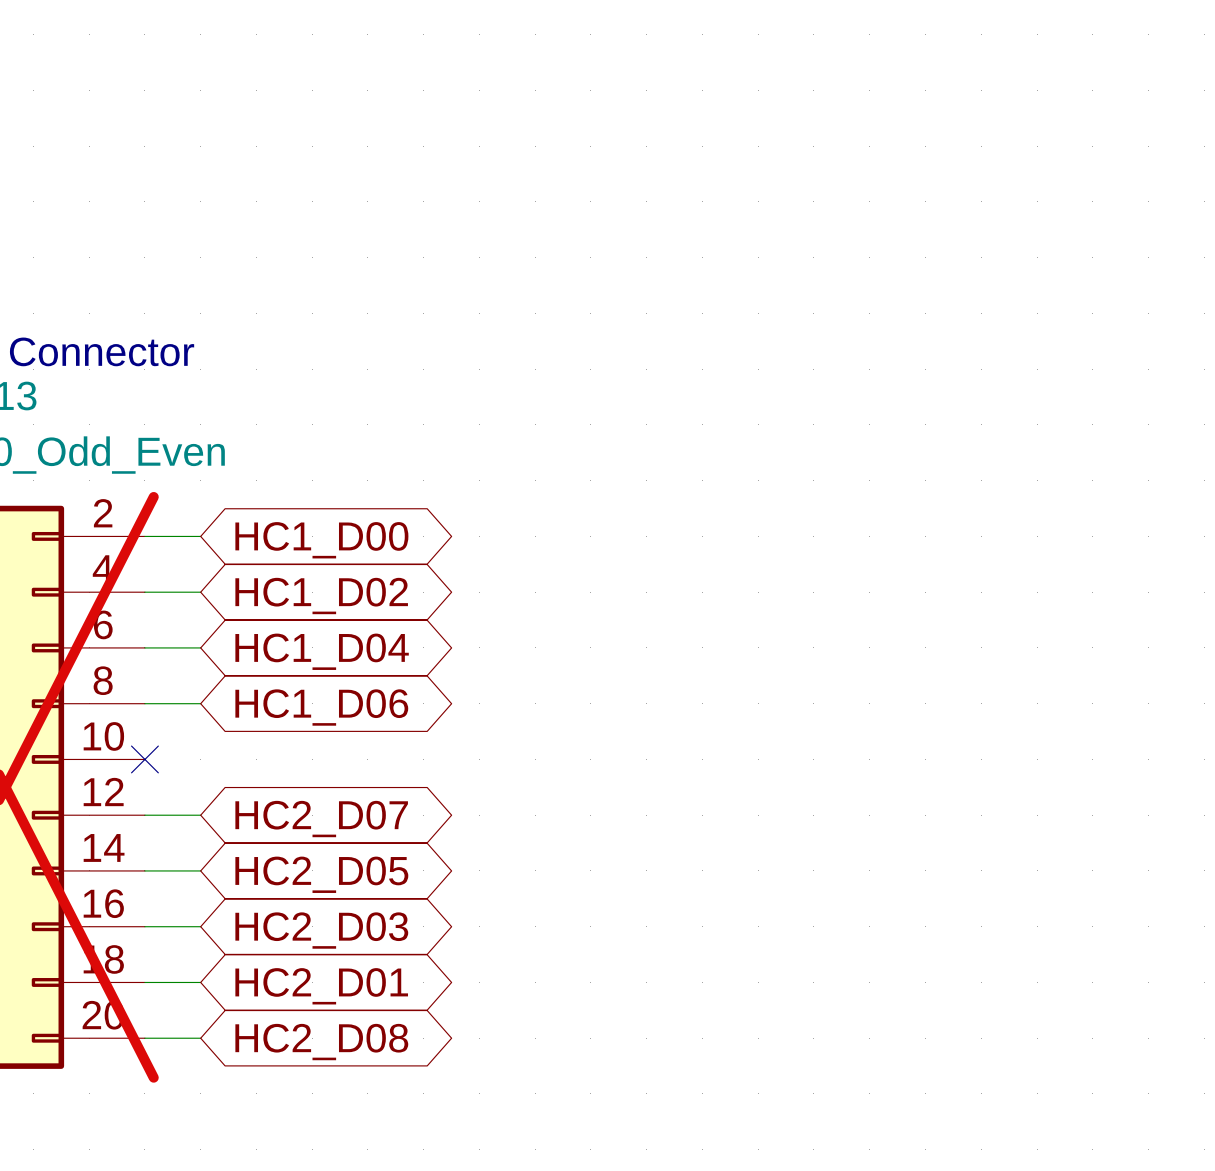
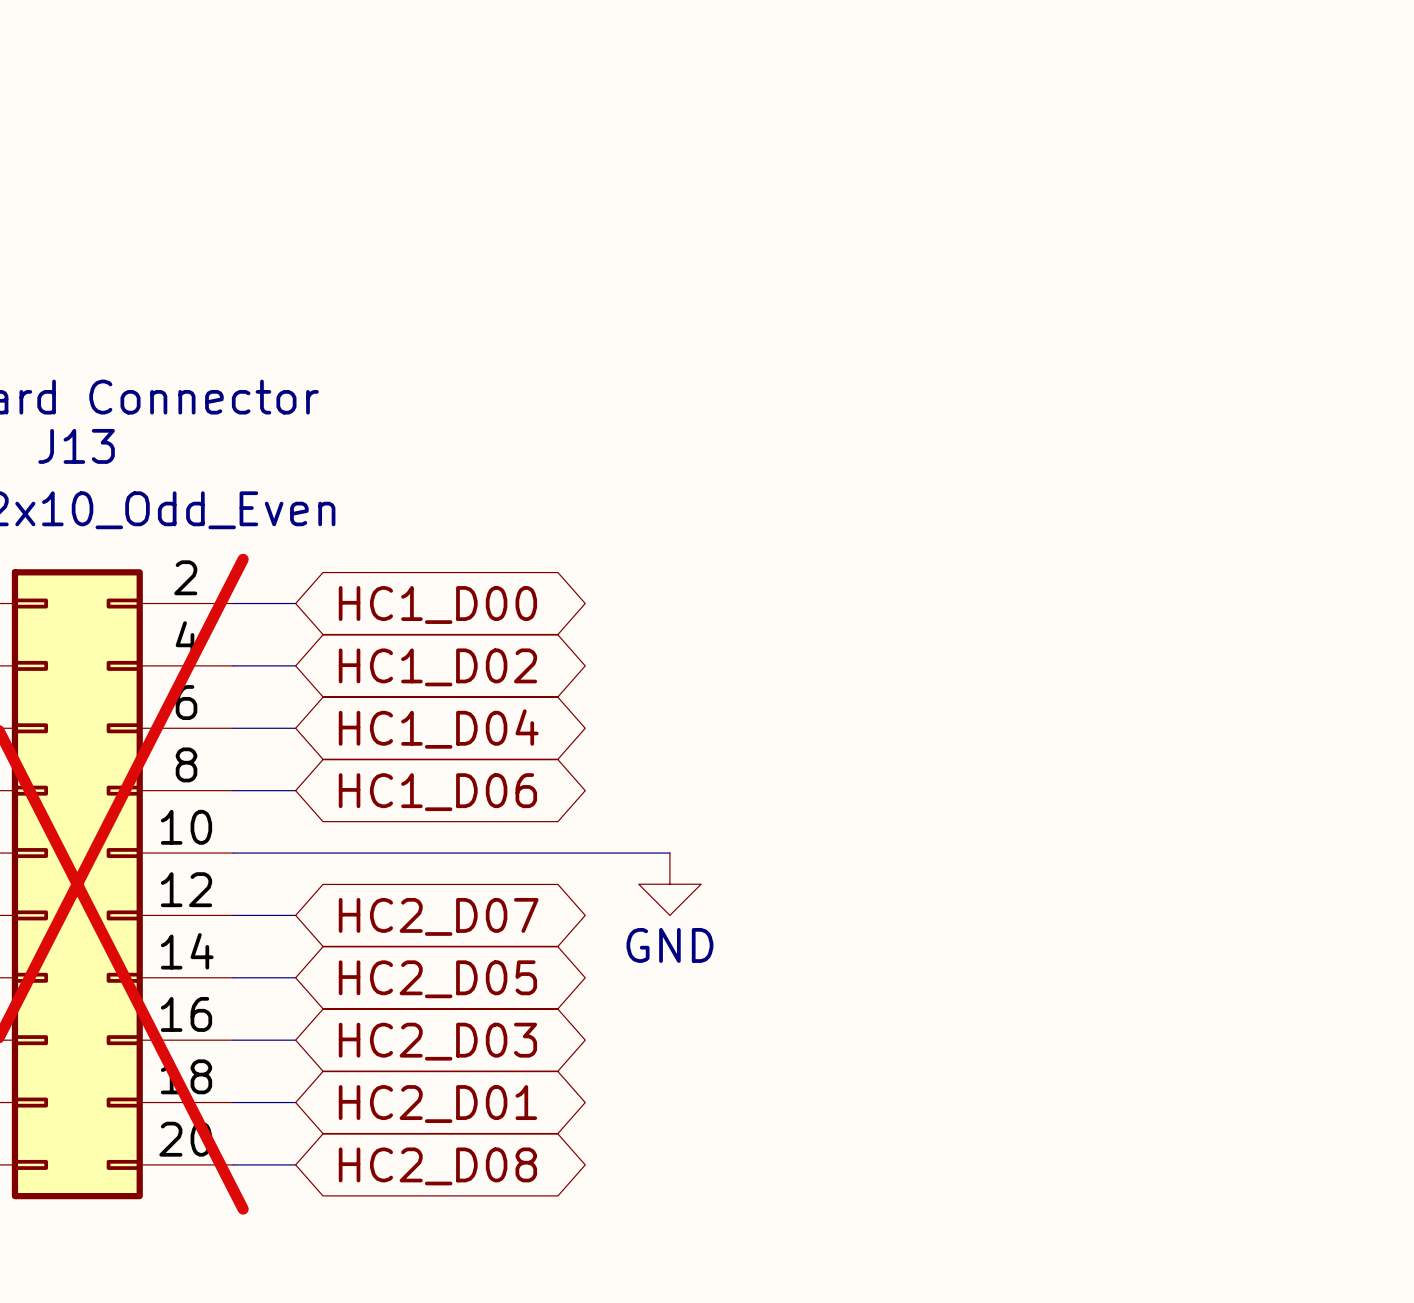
wire: none -> (233, 853) (669, 853)
no-connect mark: (144, 759) -> none
power symbol: none -> GND (669, 884)

